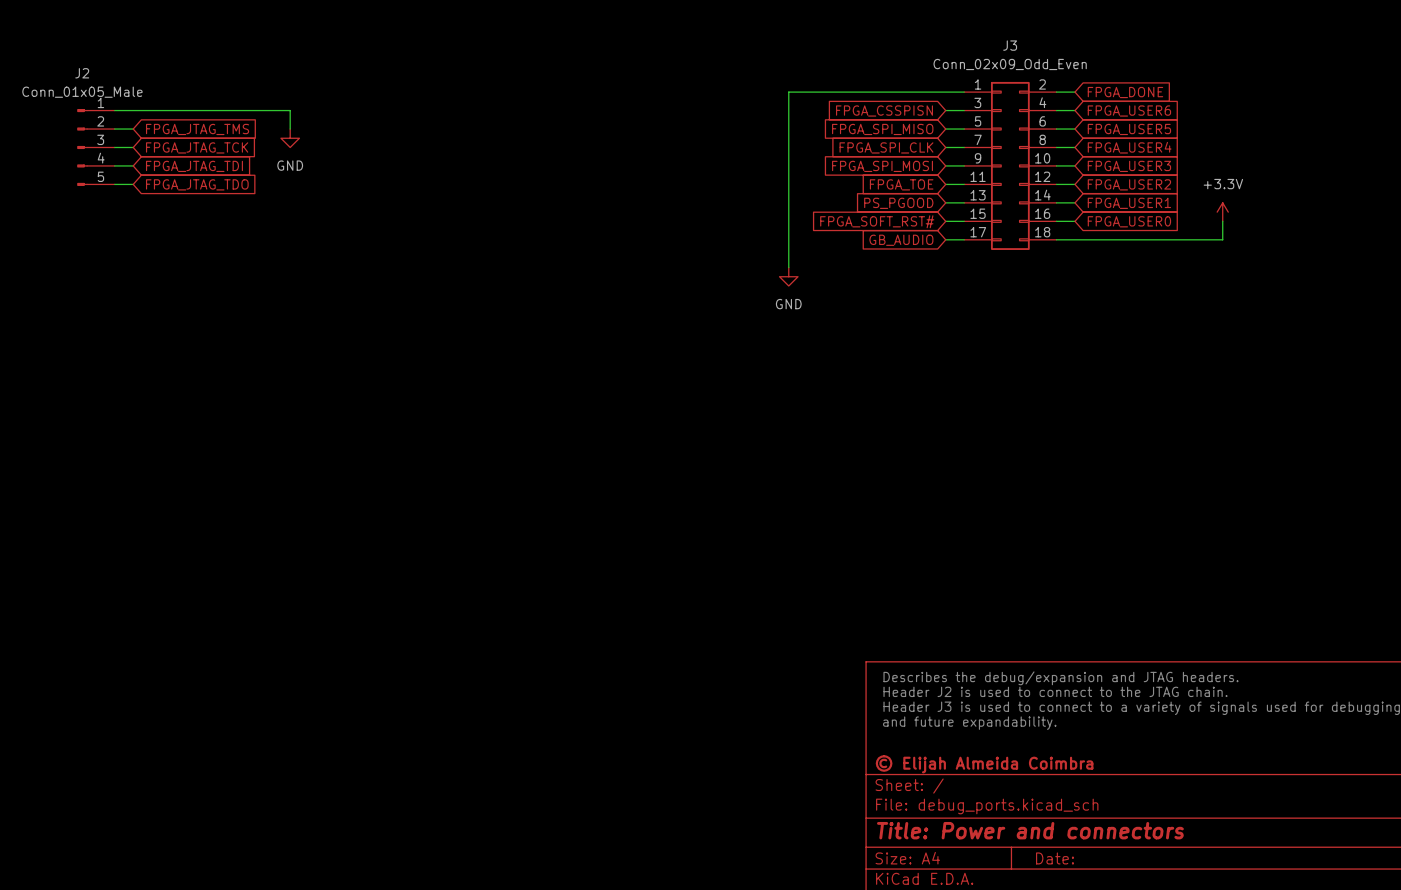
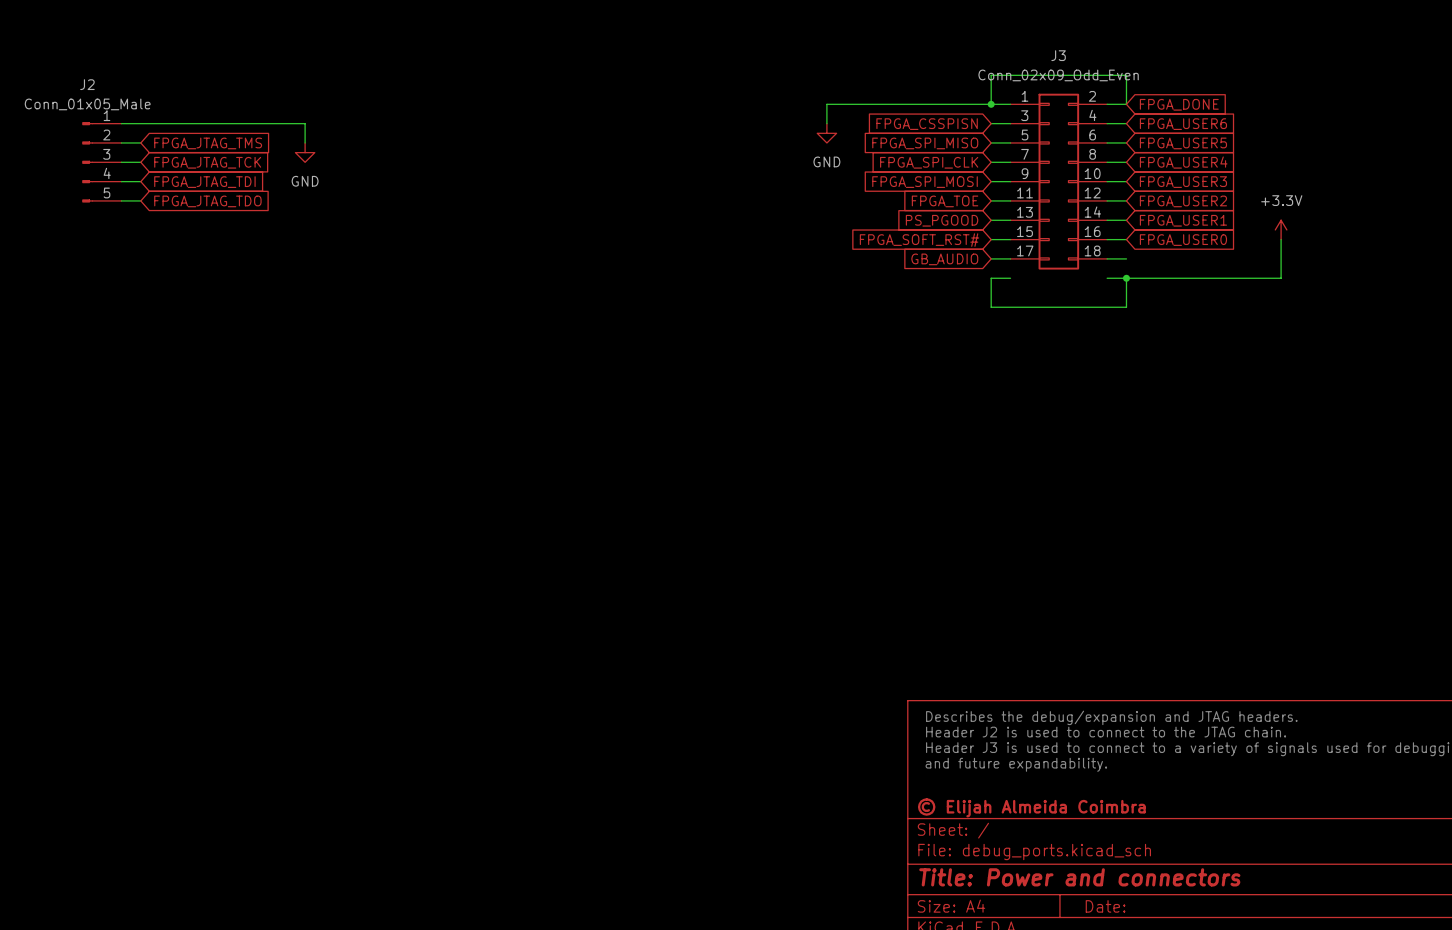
wire: none -> (991, 104) (991, 75) (1126, 75) (1126, 104)
junction: none -> (991, 104)
wire: (788, 110) (788, 267) -> none
wire: (1074, 239) (1222, 239) -> (1107, 278) (1281, 278) (1281, 258)
wire: none -> (1010, 278) (991, 278) (991, 307) (1126, 307) (1126, 278)
junction: none -> (1126, 278)
power symbol position: GND (788, 276) -> GND (826, 133)

